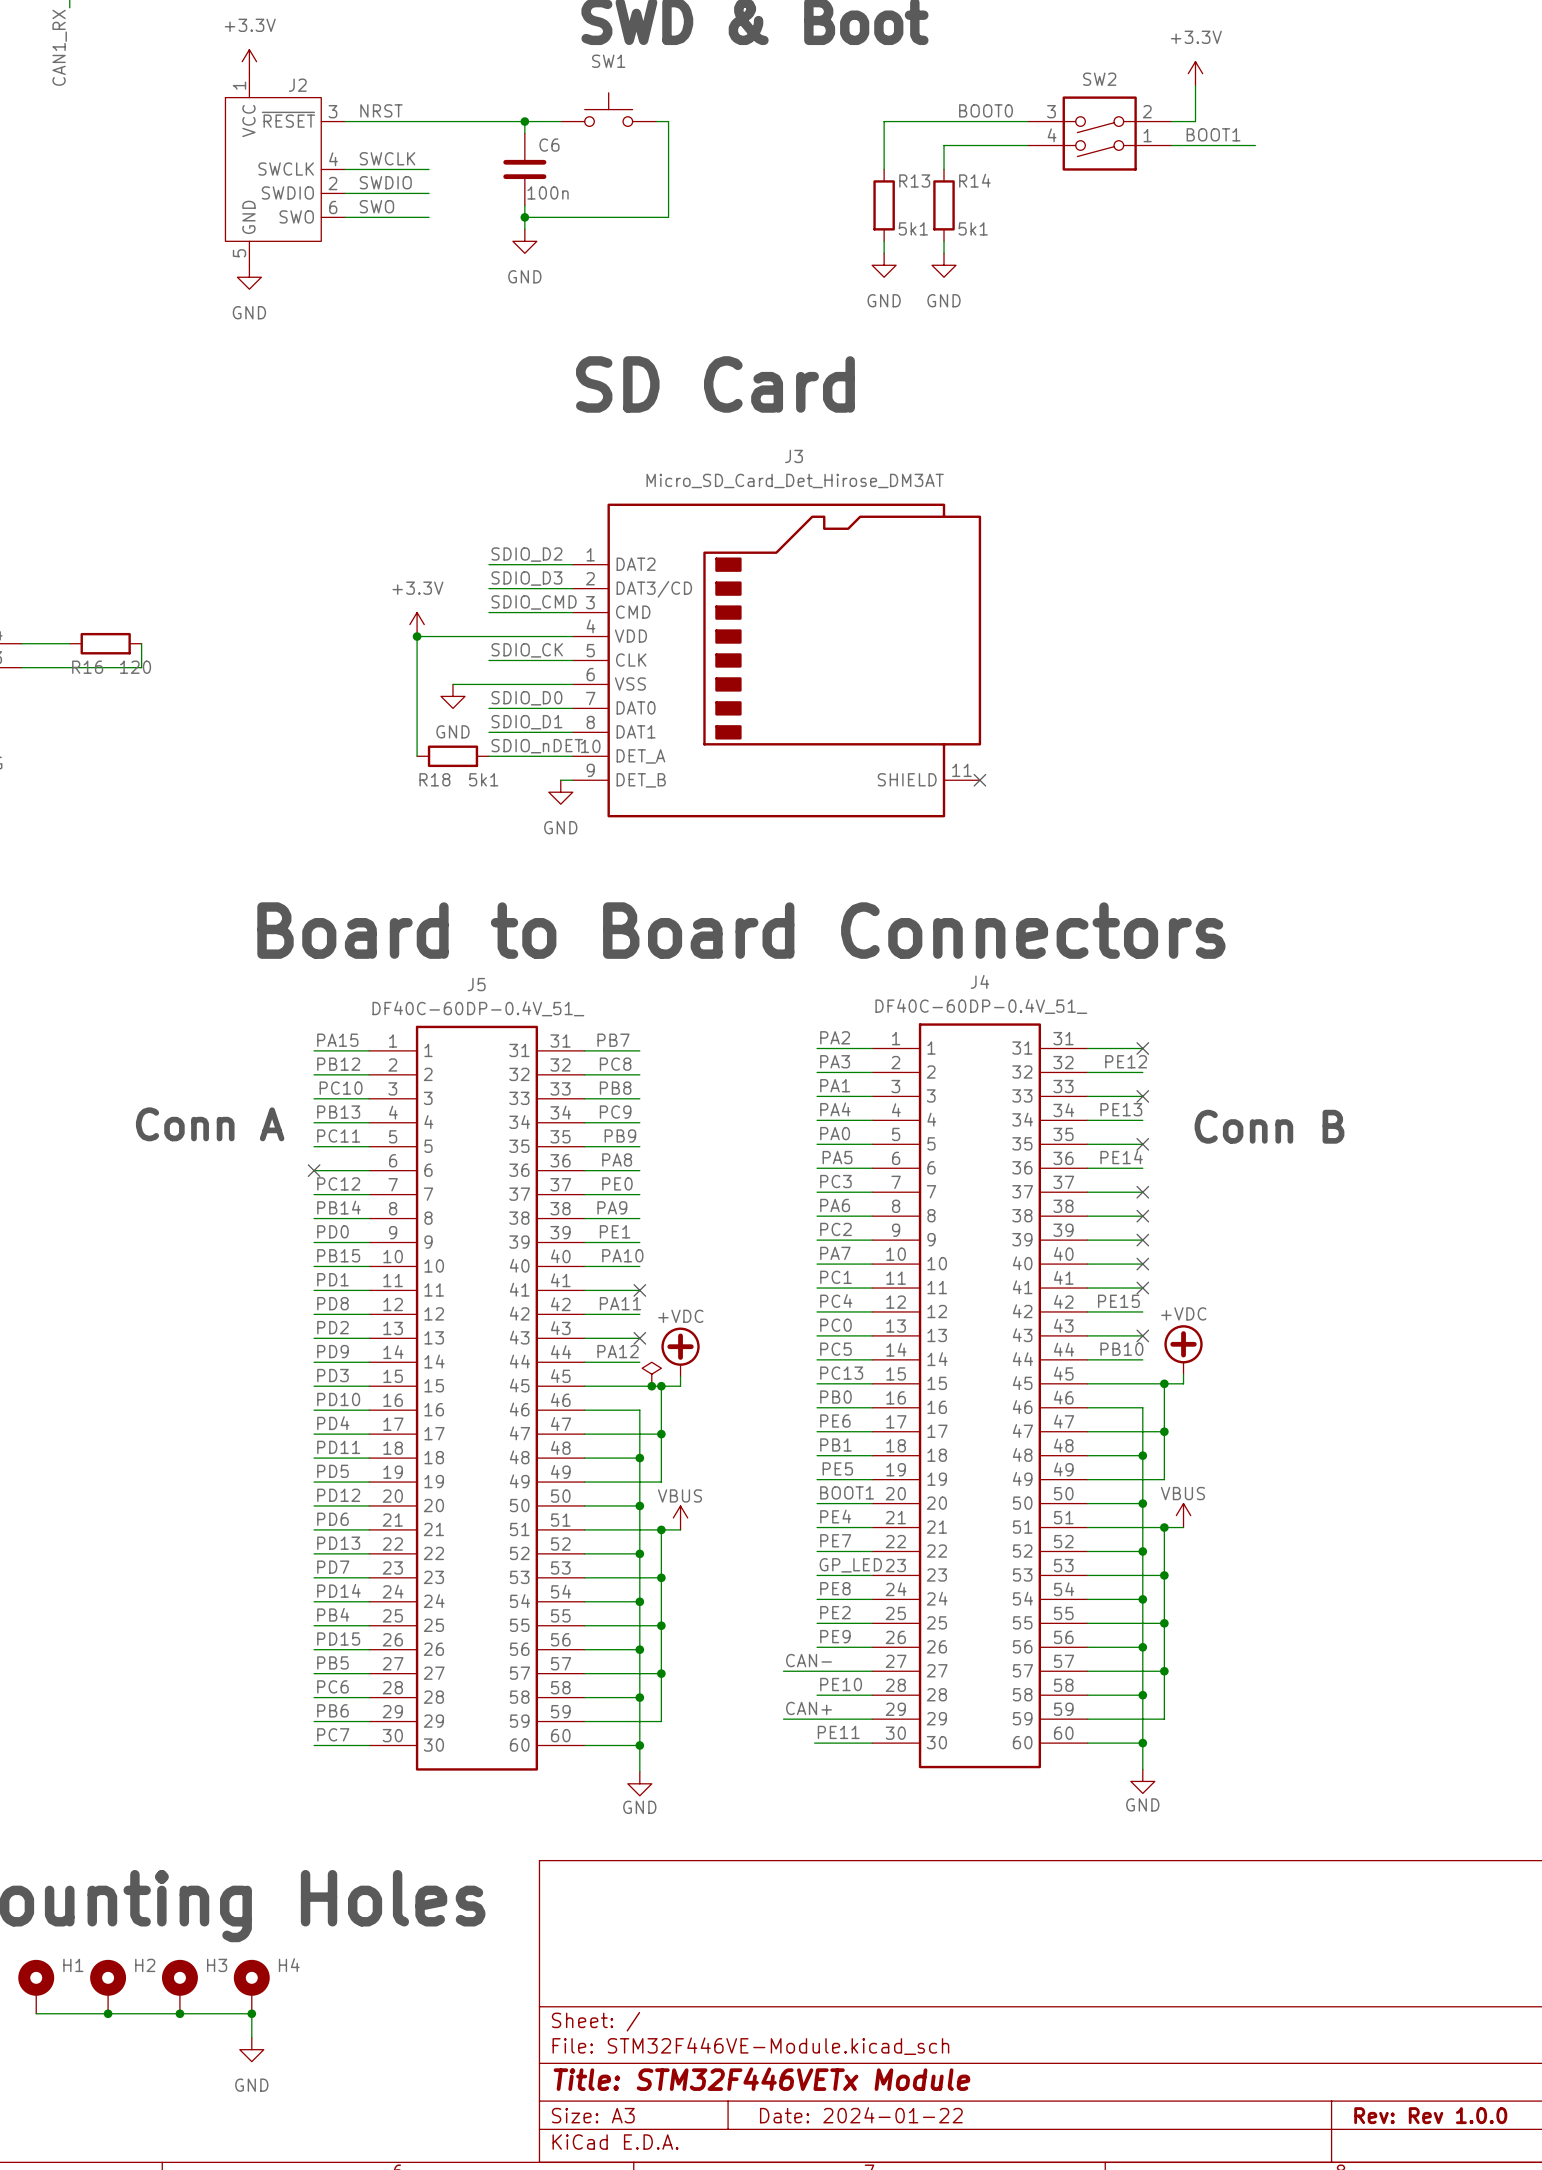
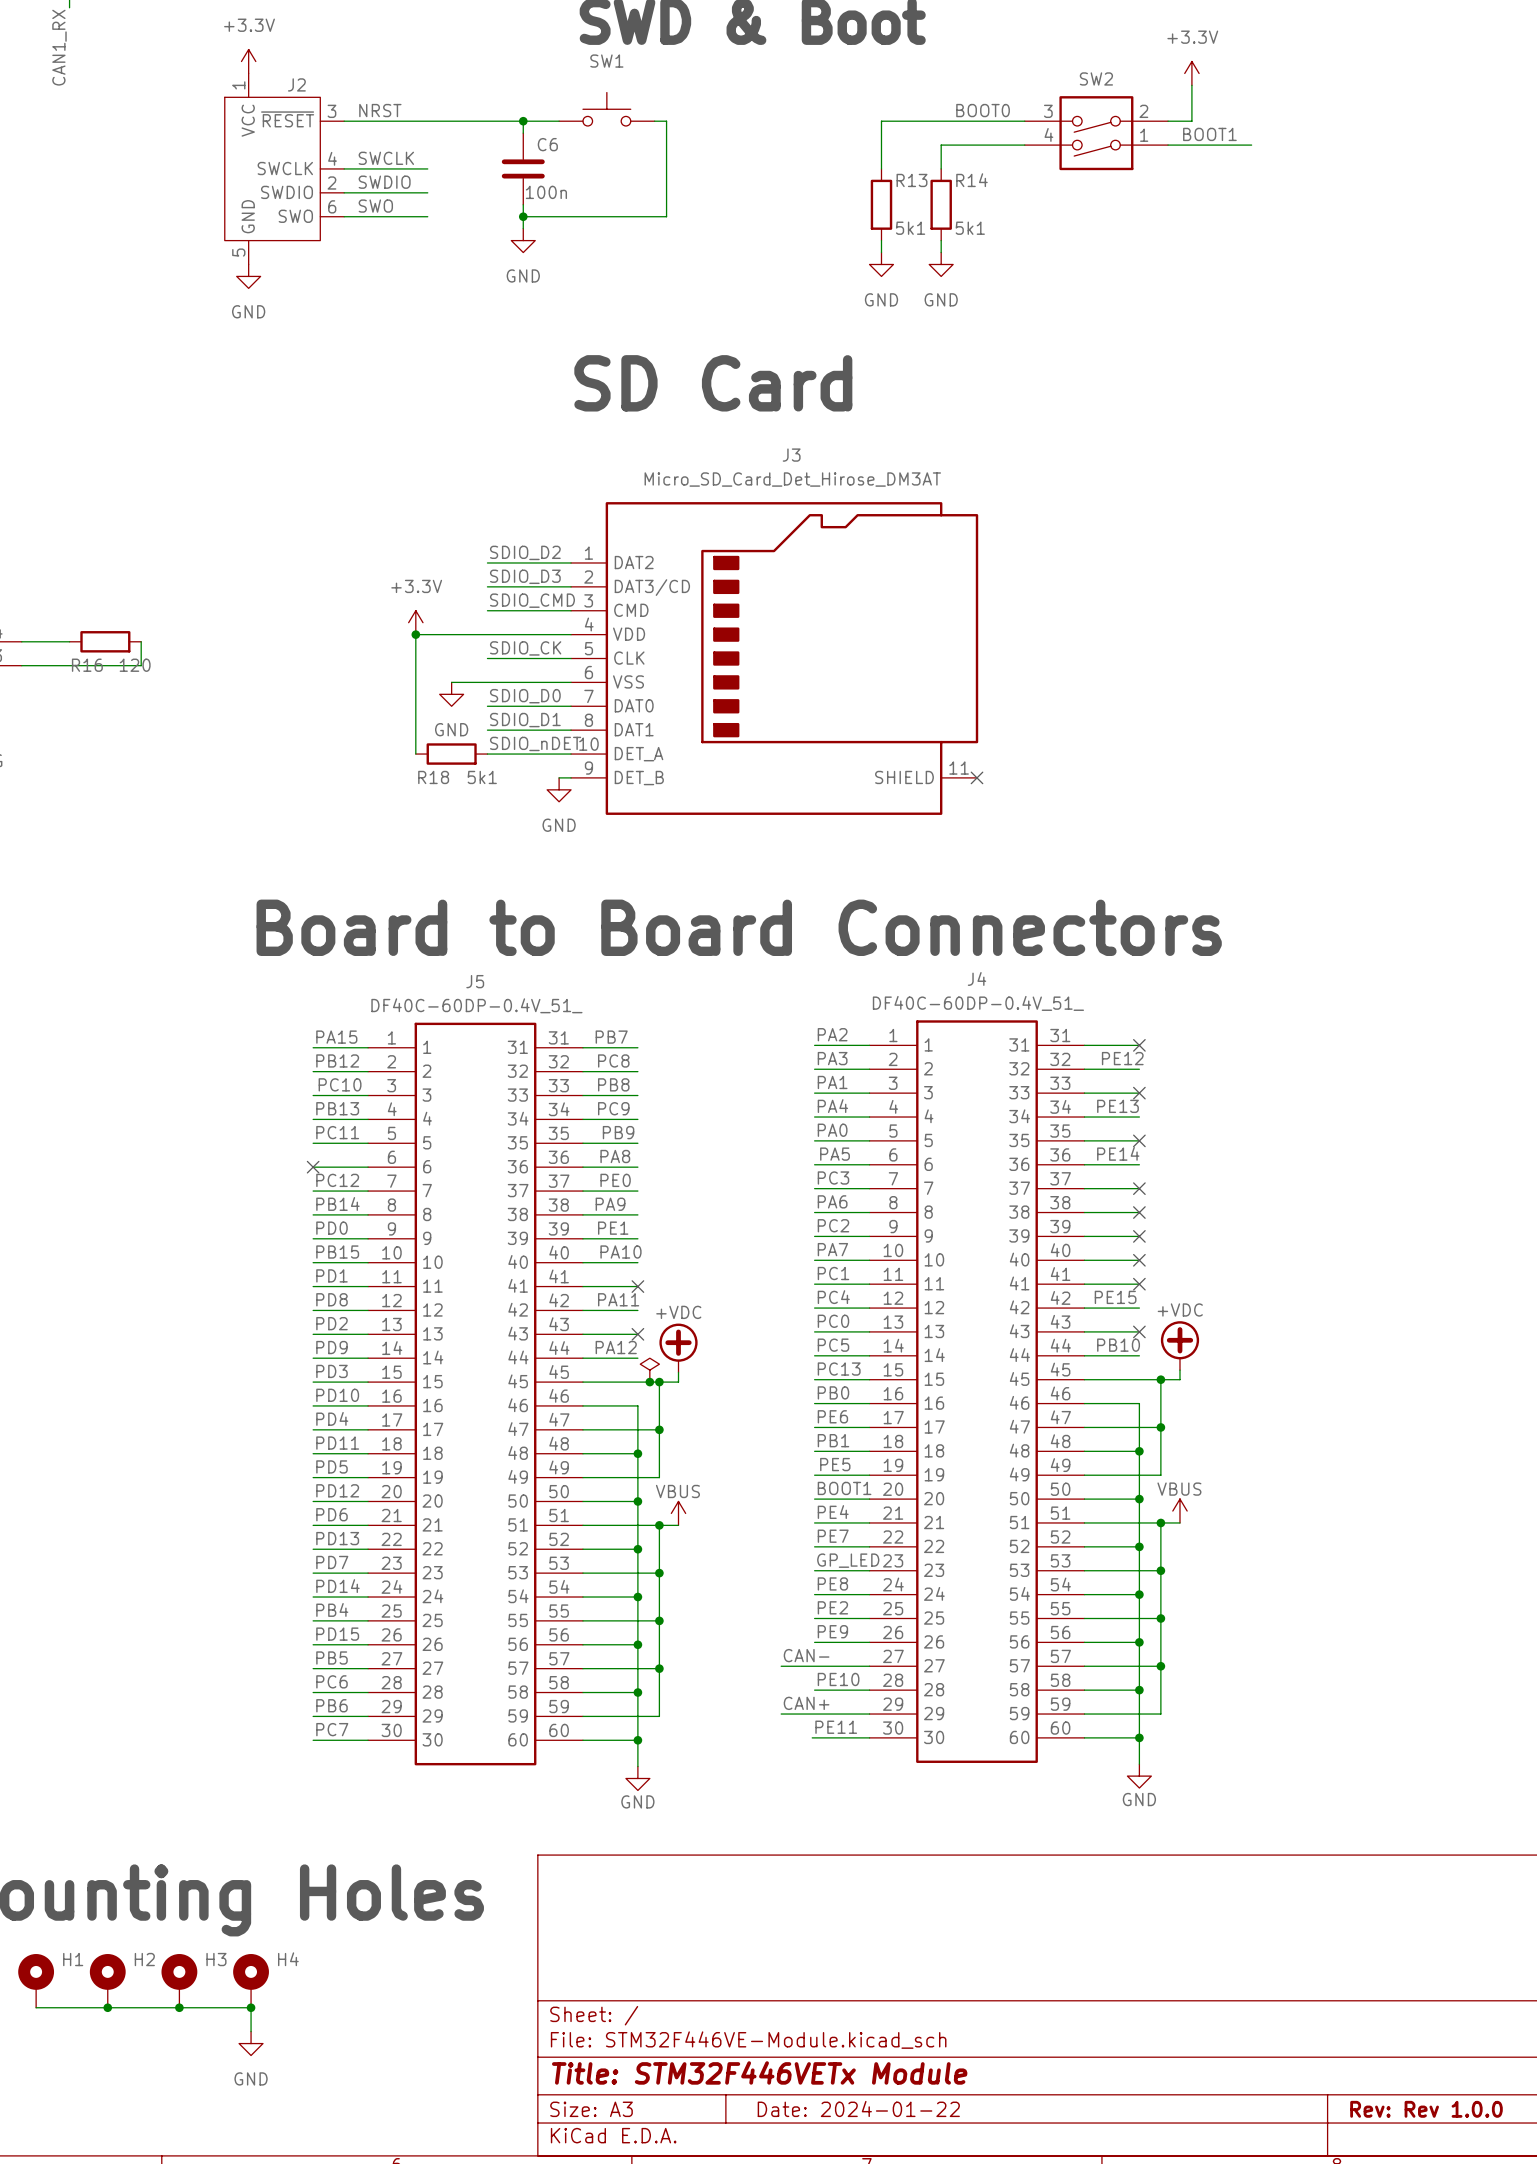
text: Conn A (210, 1124) -> none
text: Conn B (1269, 1126) -> none

